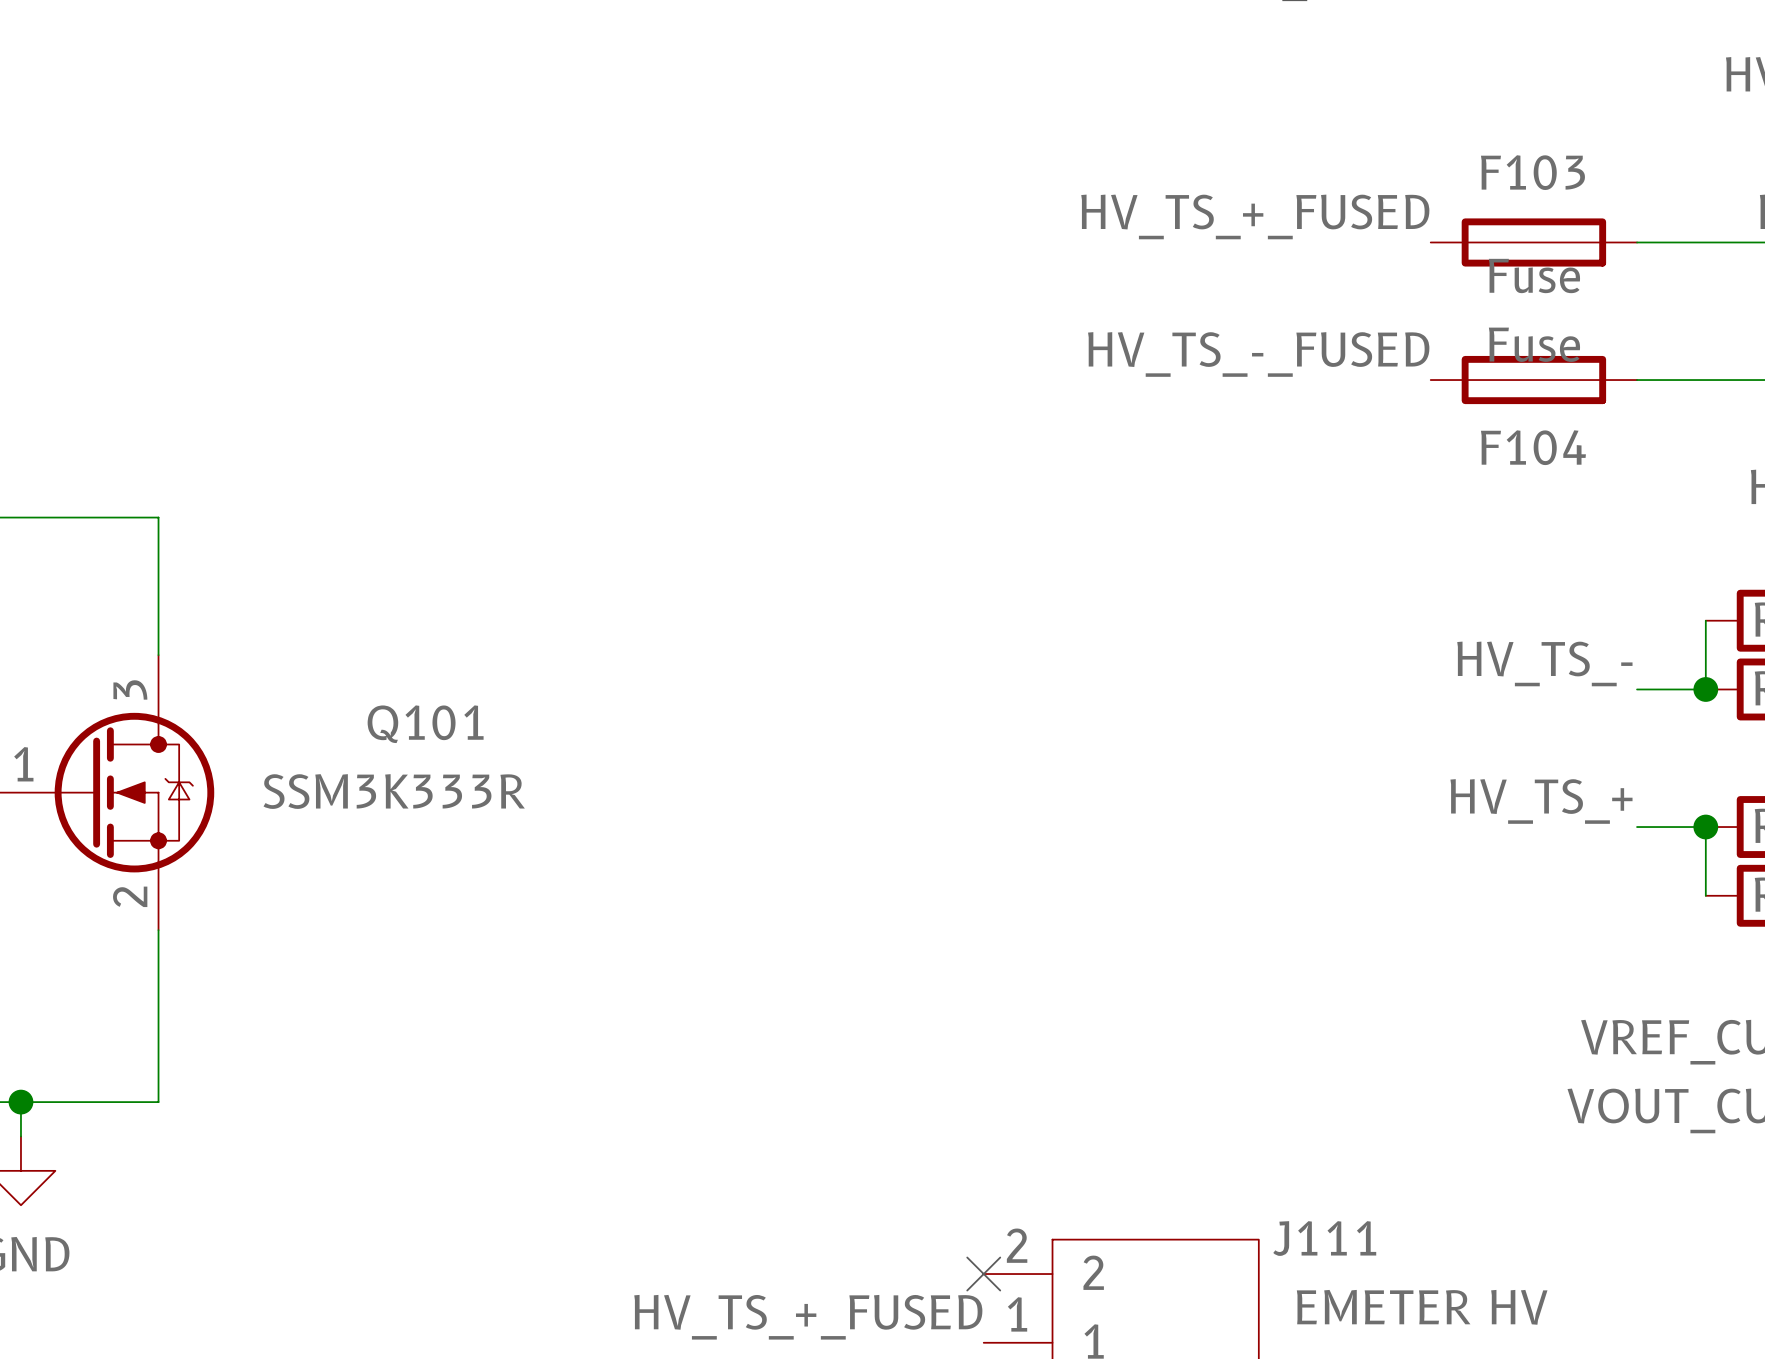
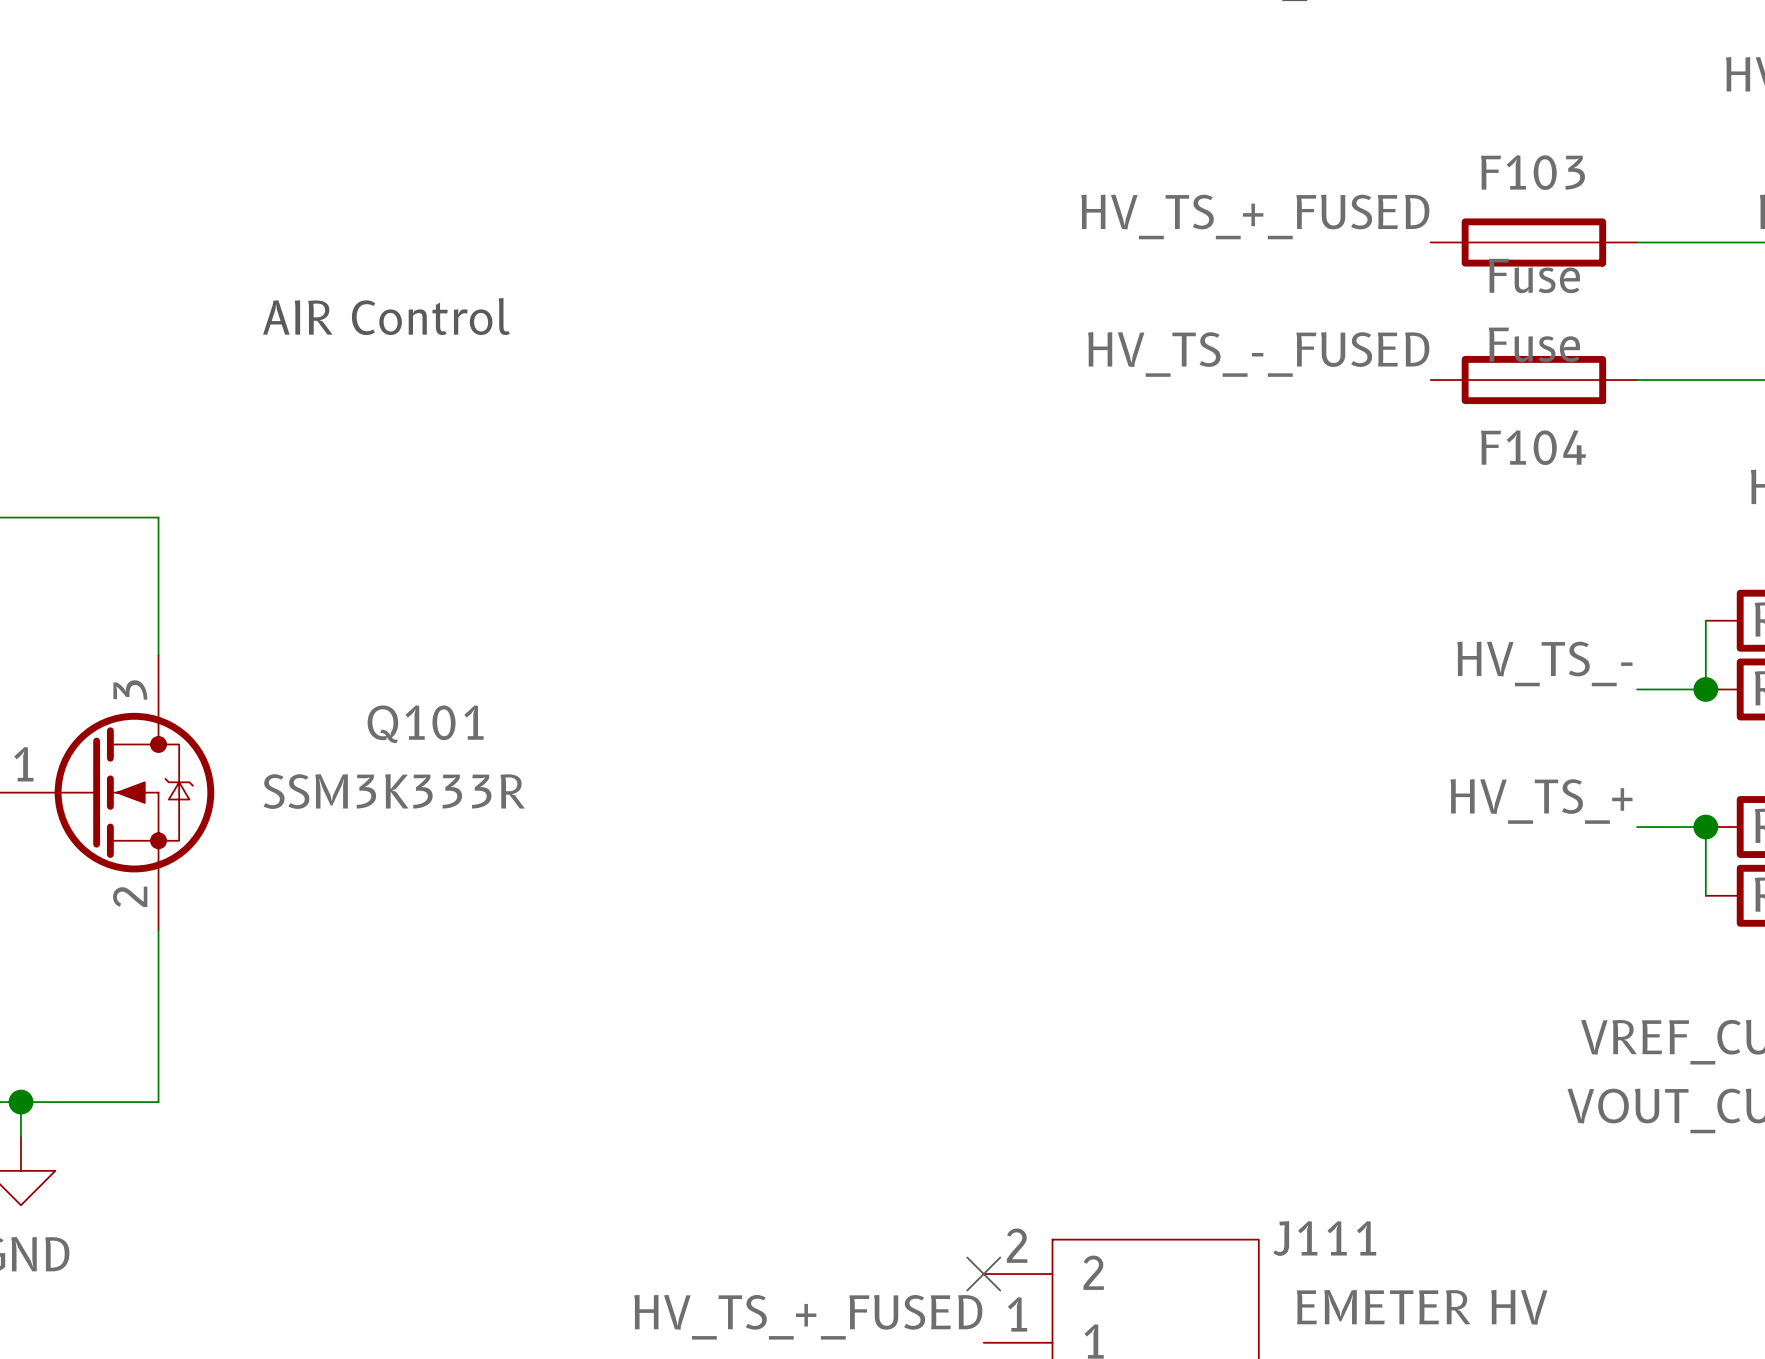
text: none -> AIR Control (386, 316)

